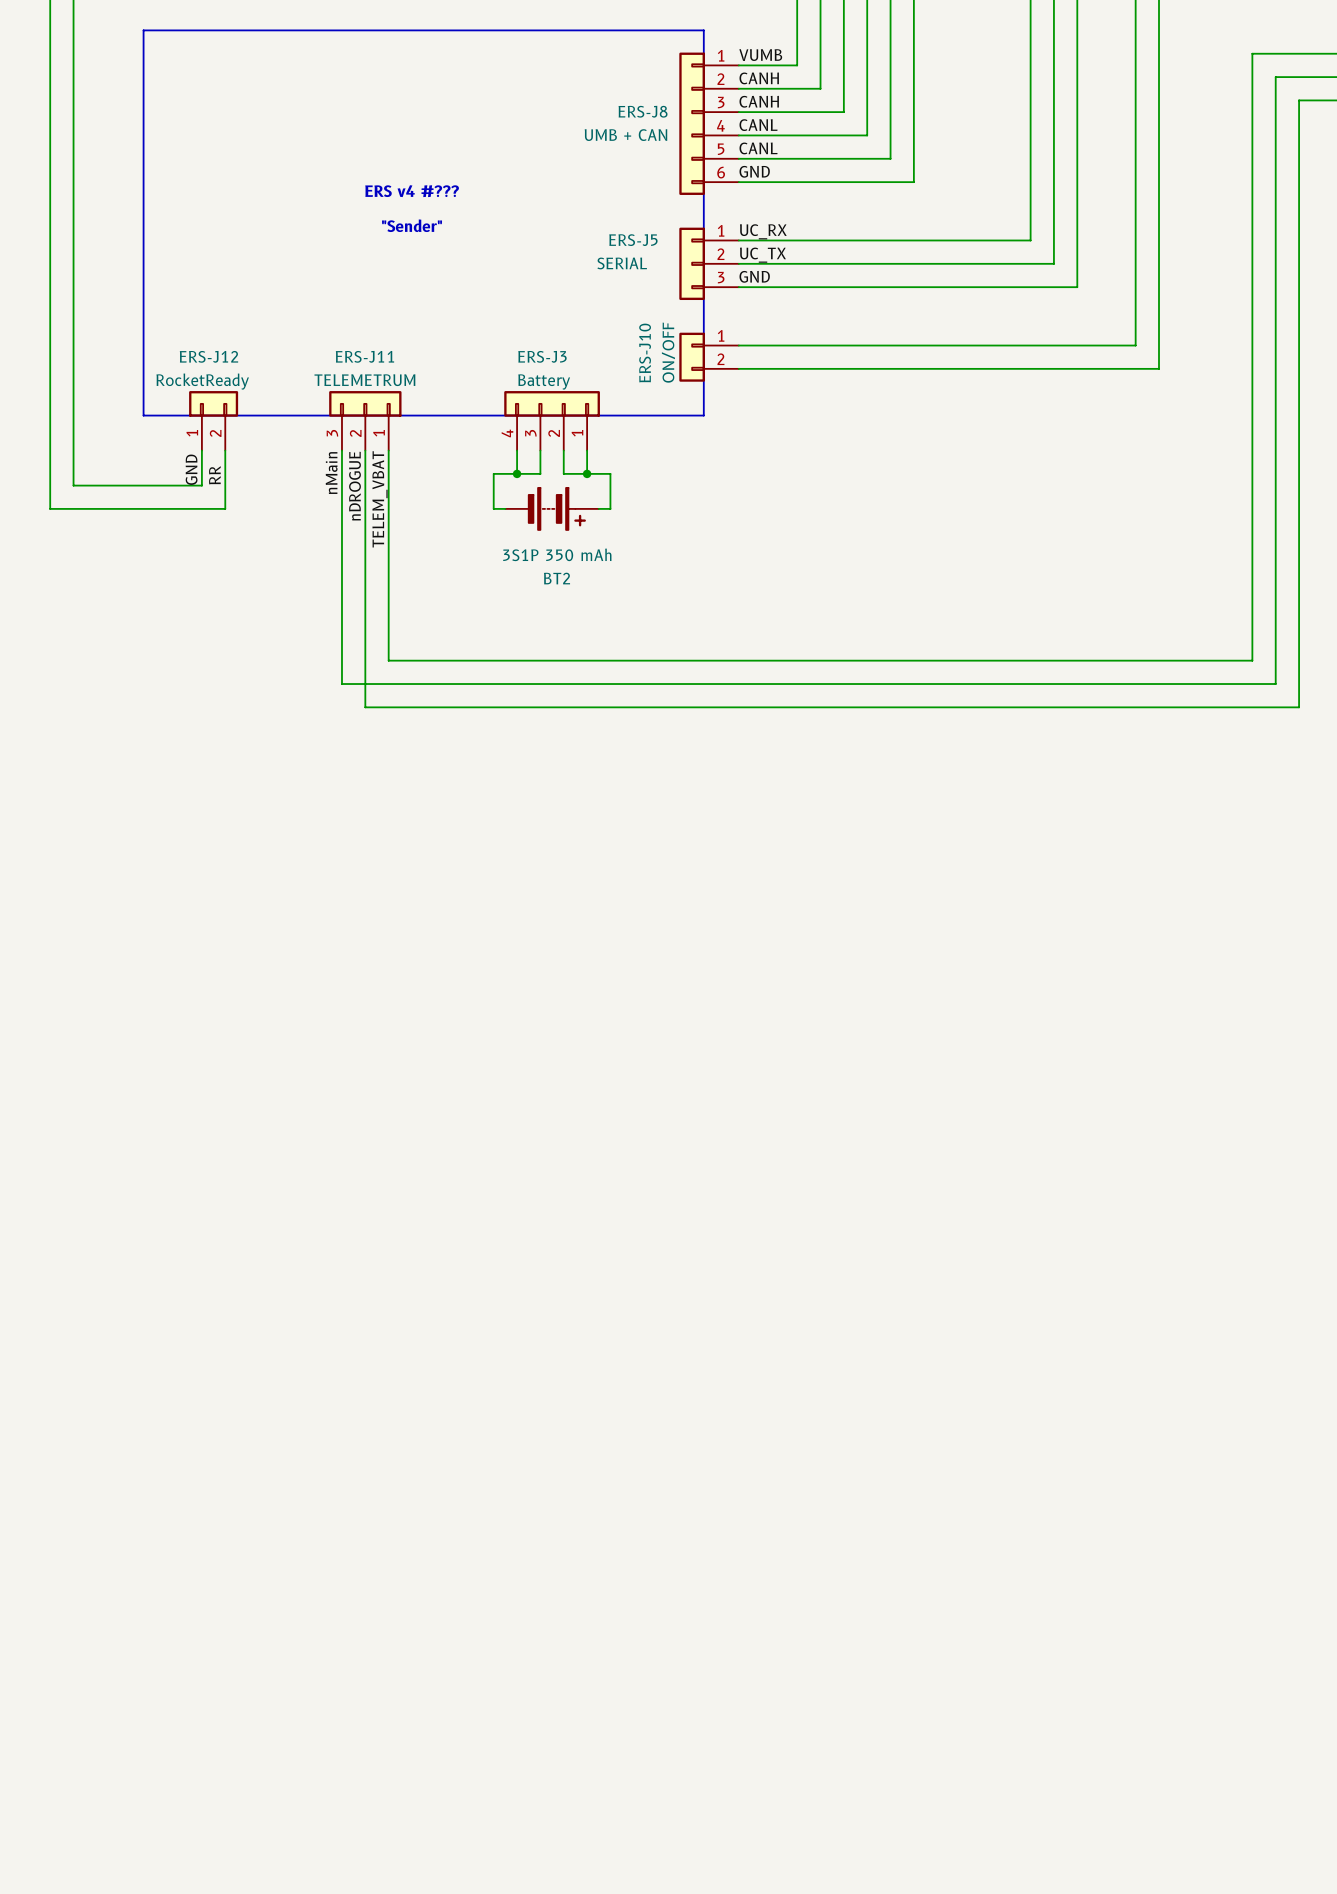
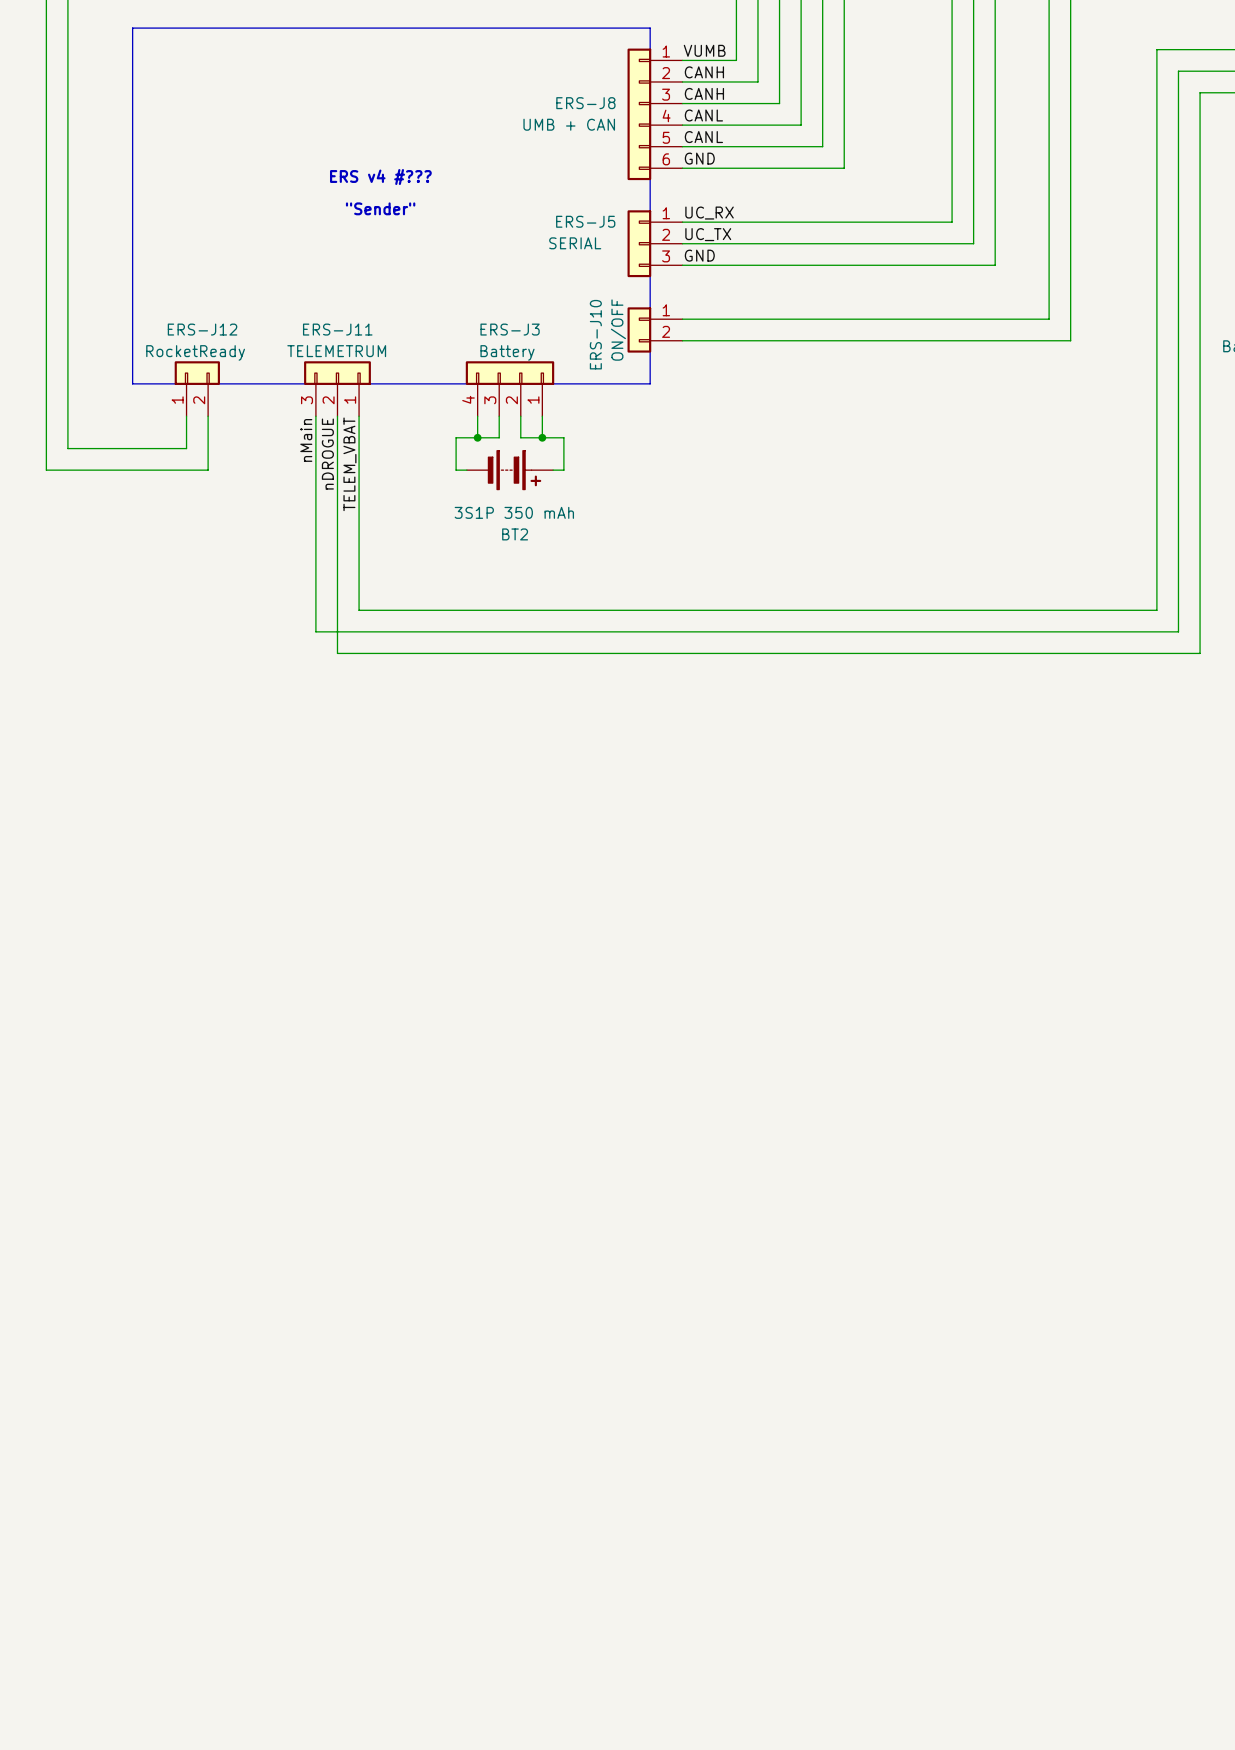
label: GND (191, 469) -> none
label: RR (214, 475) -> none

